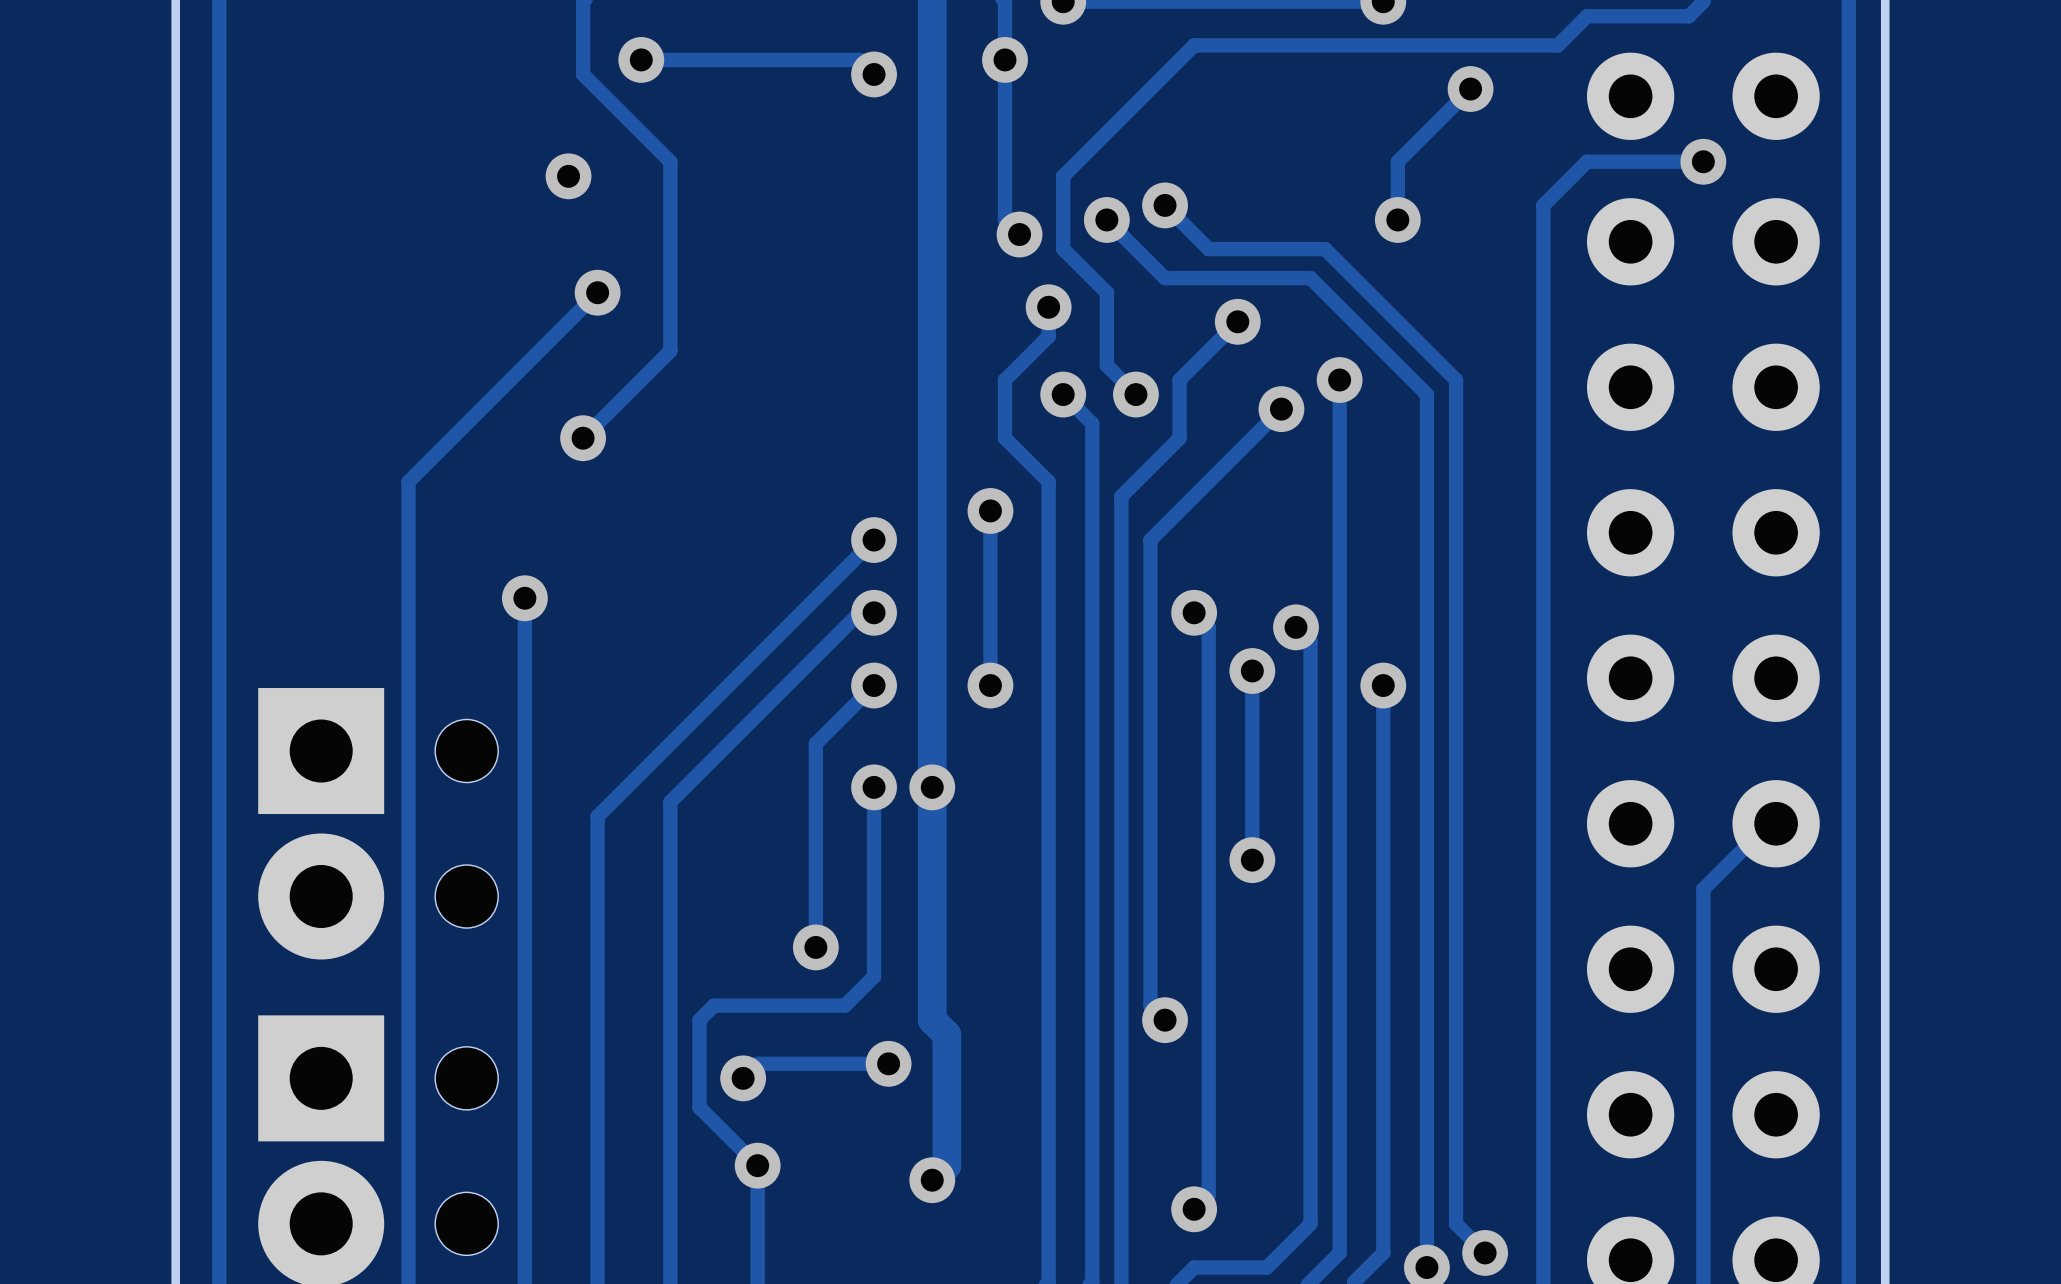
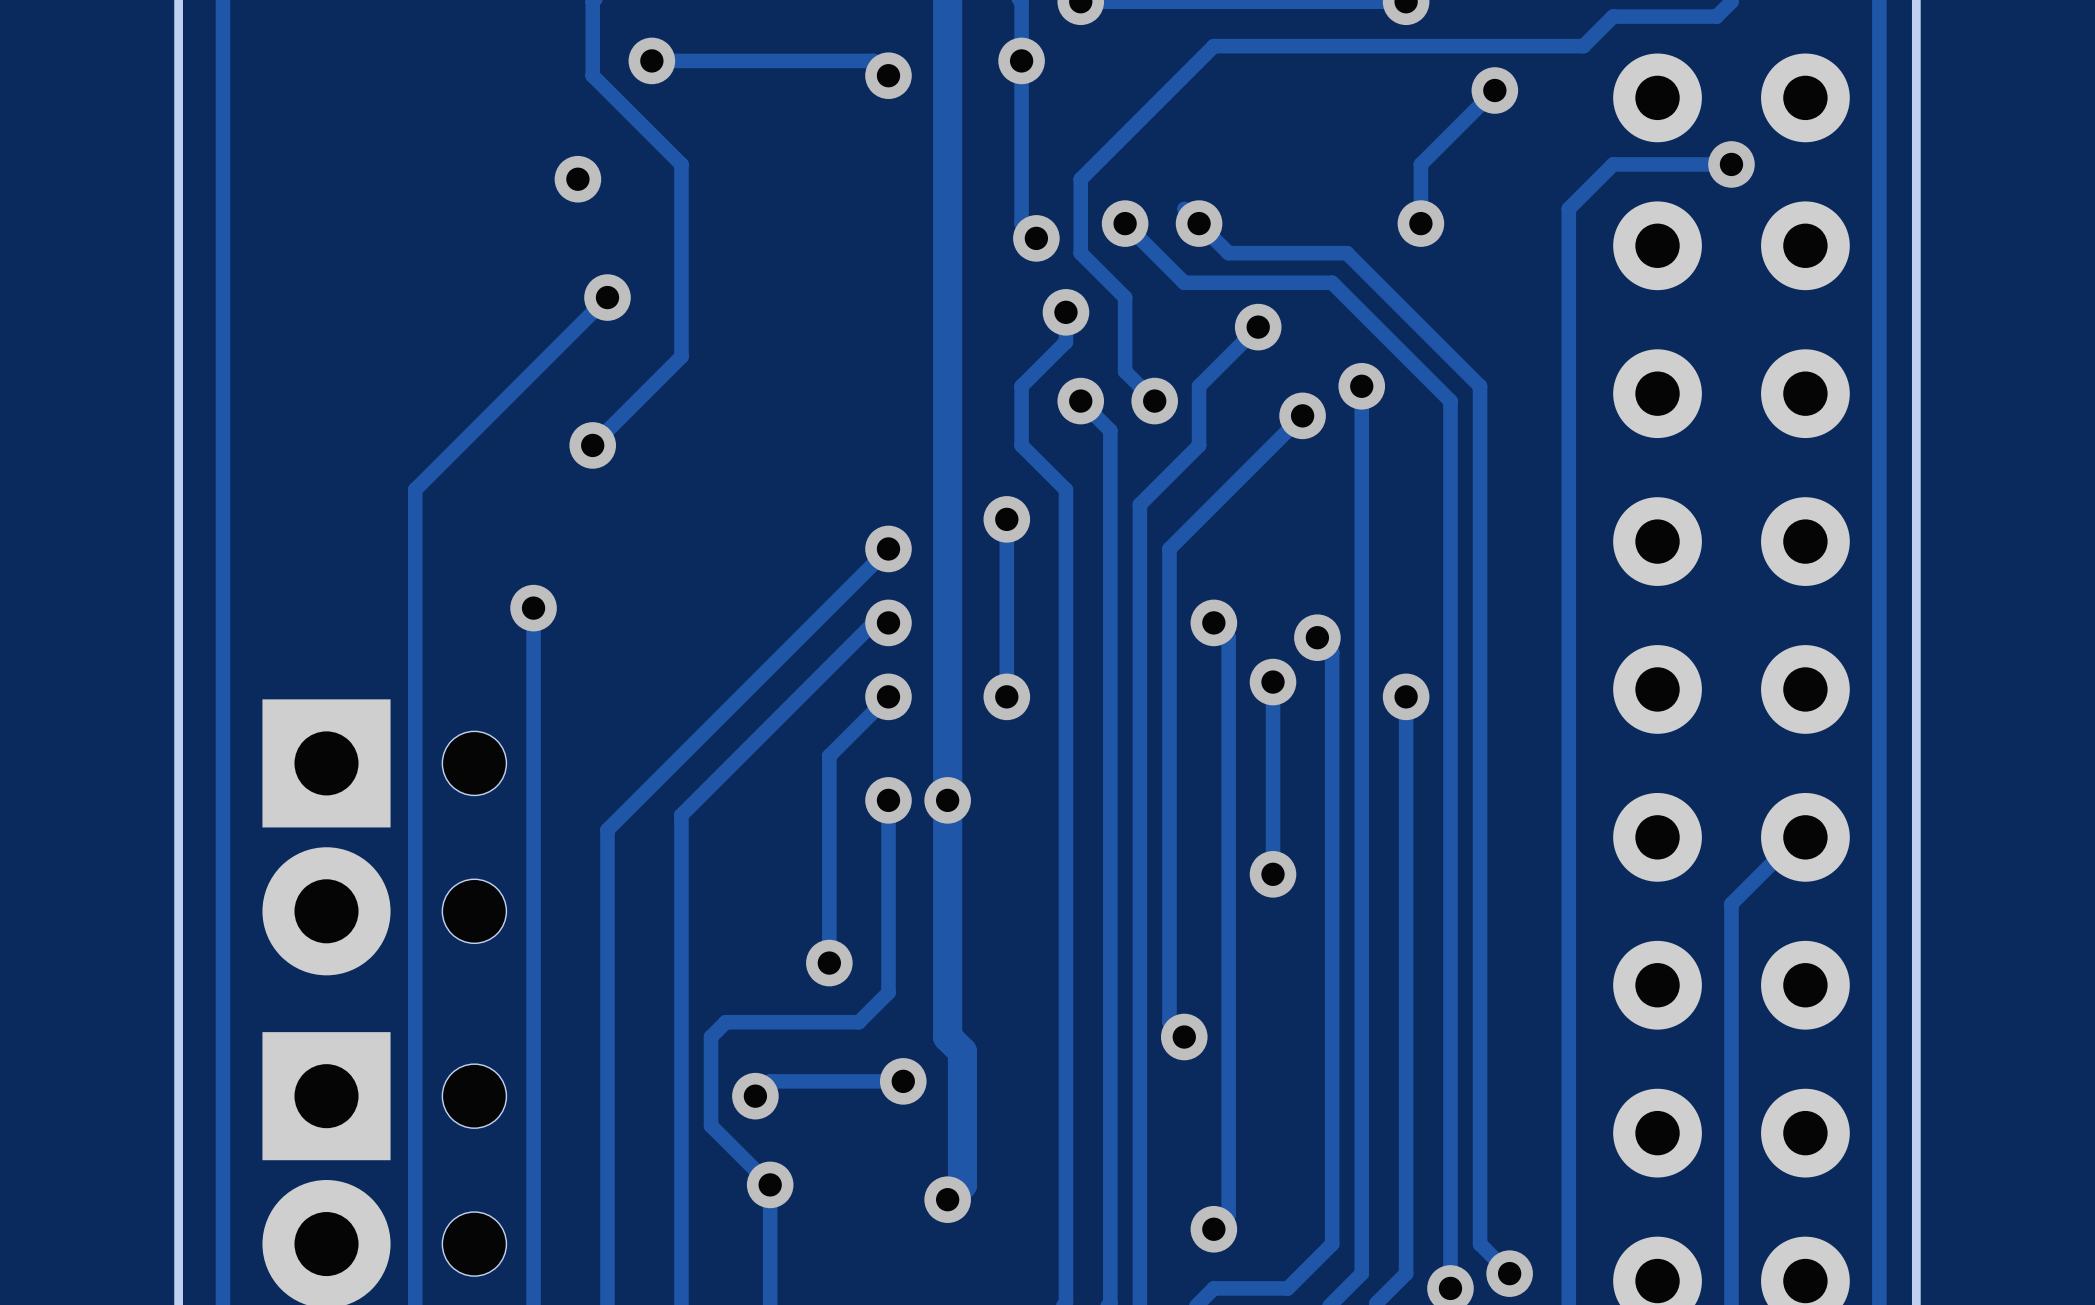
via position: (1165, 205) -> (1199, 223)

